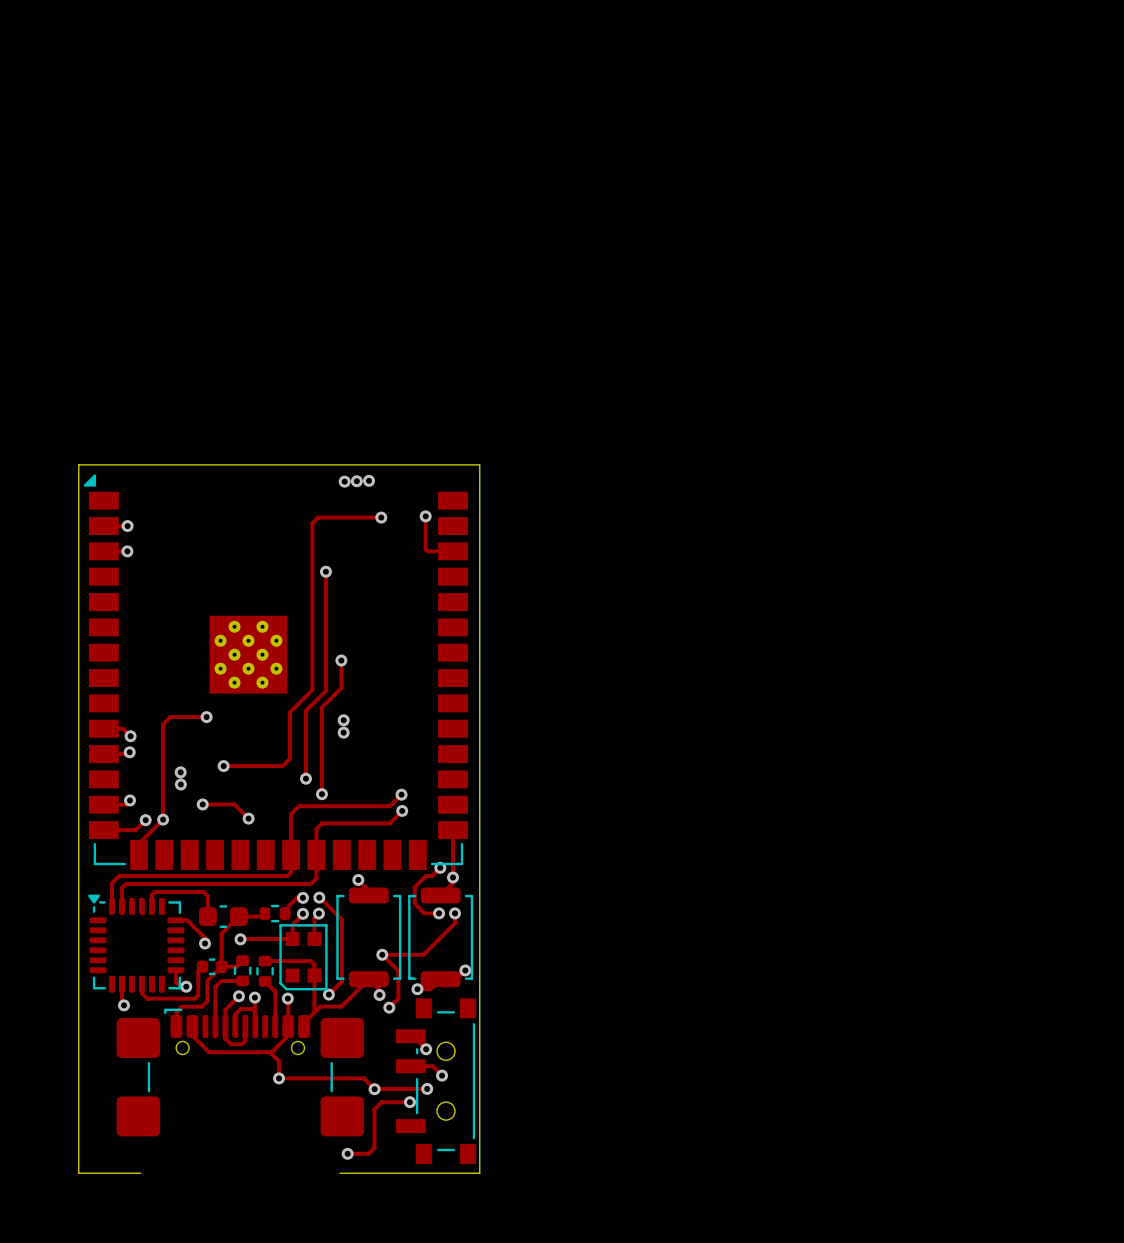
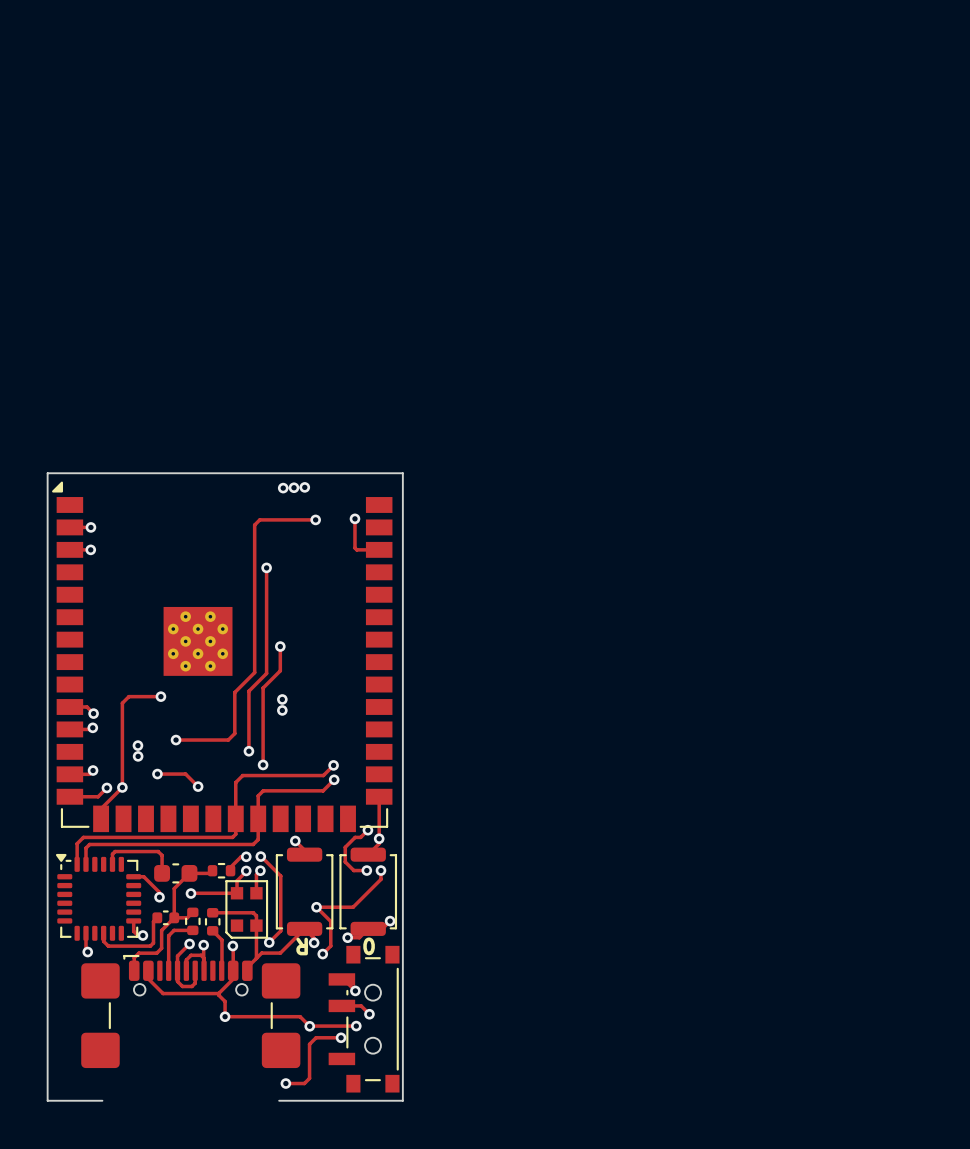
text: none -> 0 (369, 946)
text: none -> R (302, 946)

